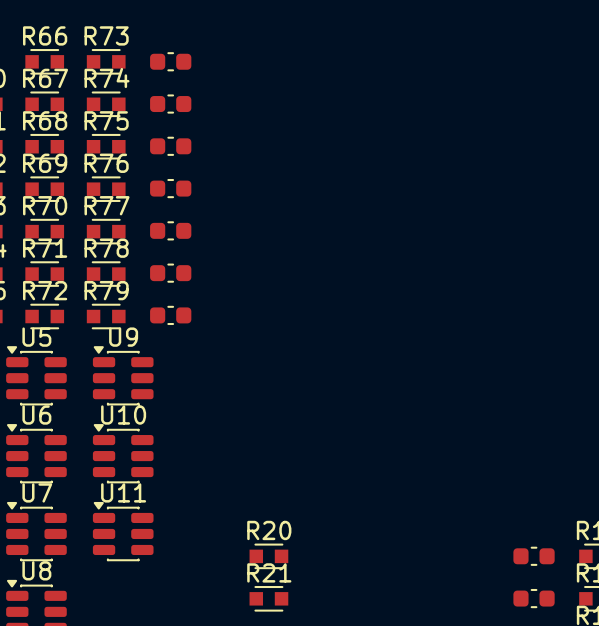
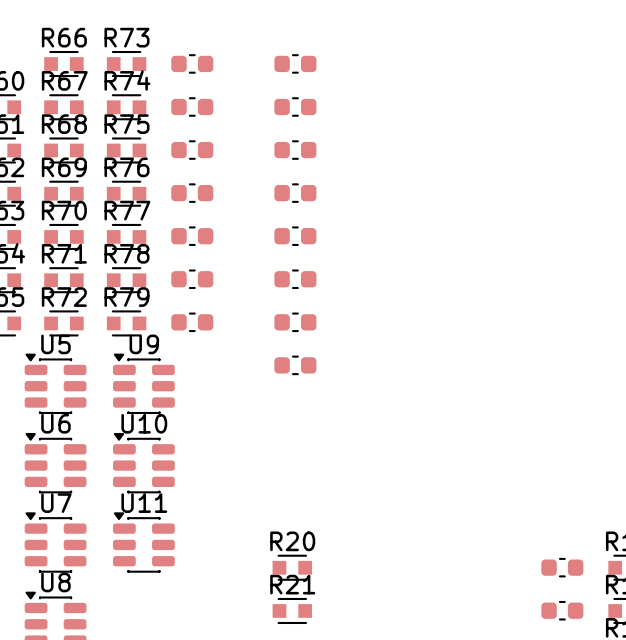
part: none -> (295, 63)
part: none -> (295, 106)
part: none -> (295, 150)
part: none -> (295, 193)
part: none -> (295, 236)
part: none -> (295, 279)
part: none -> (295, 322)
part: none -> (295, 365)

